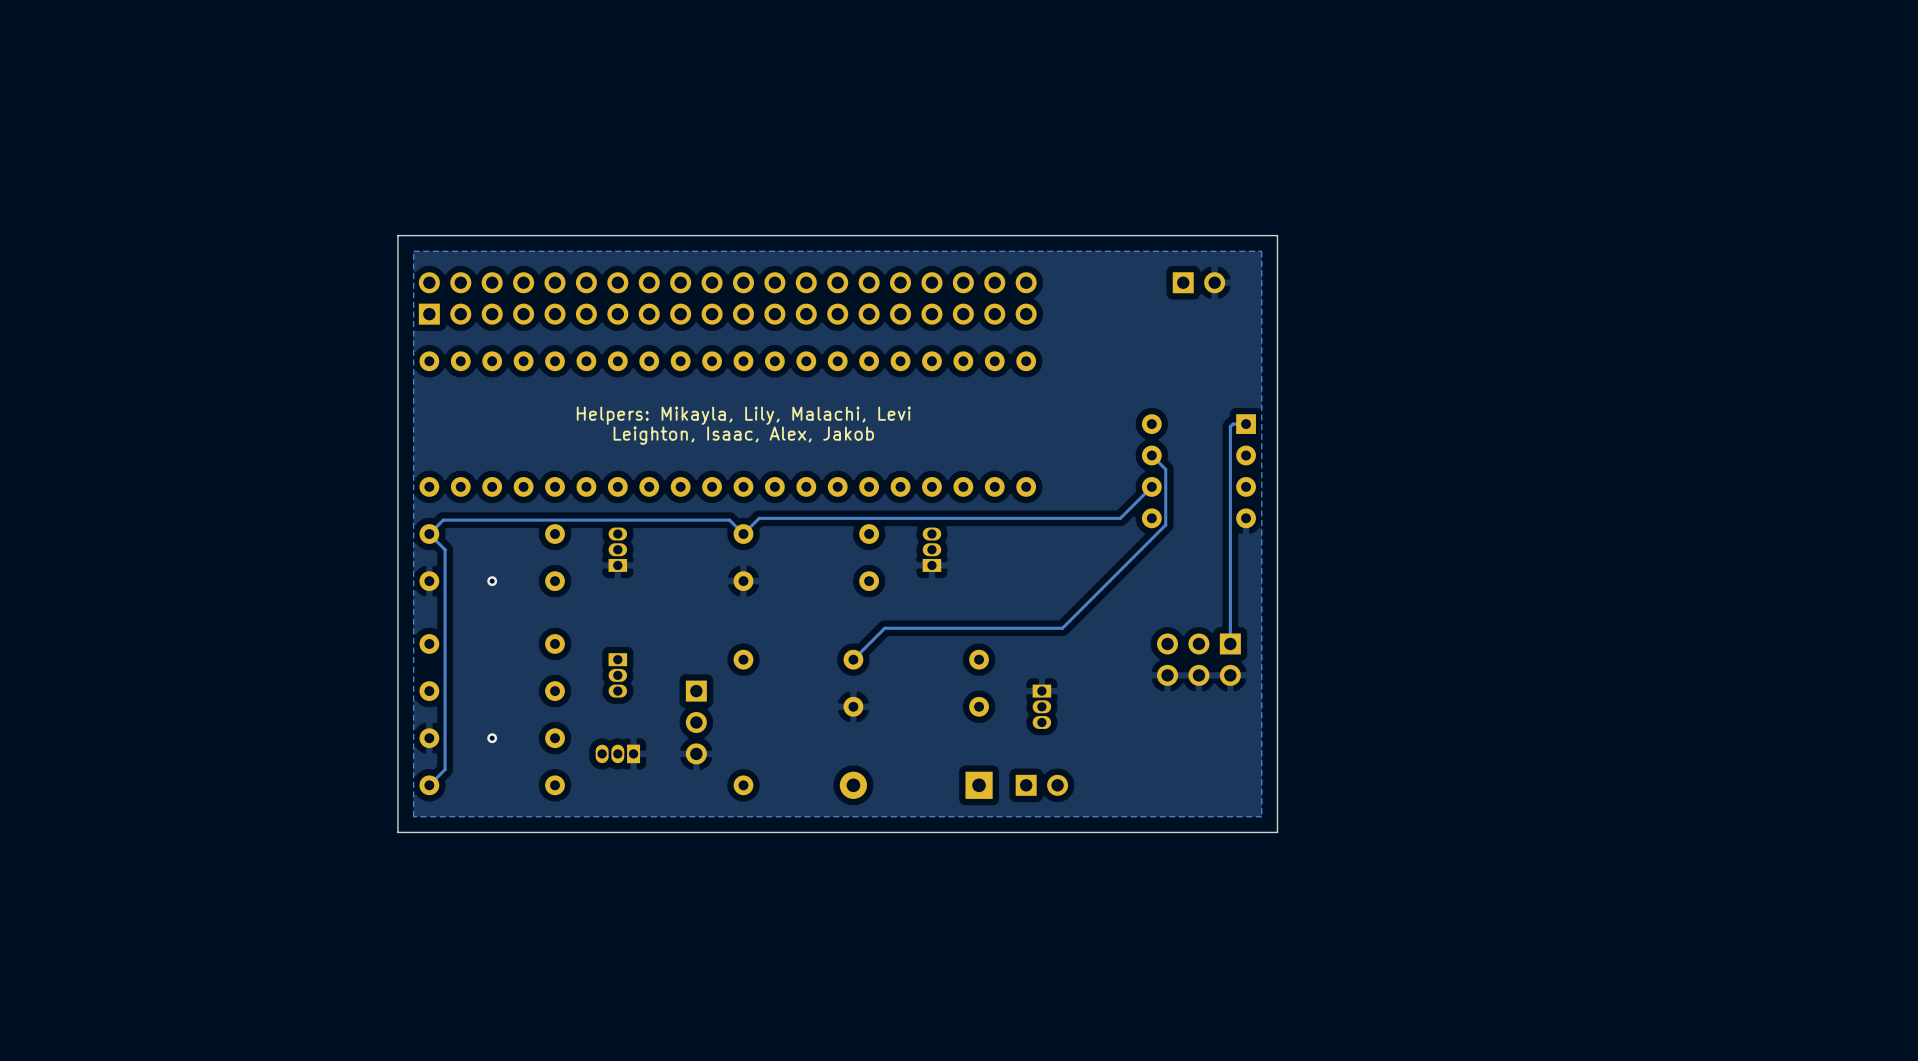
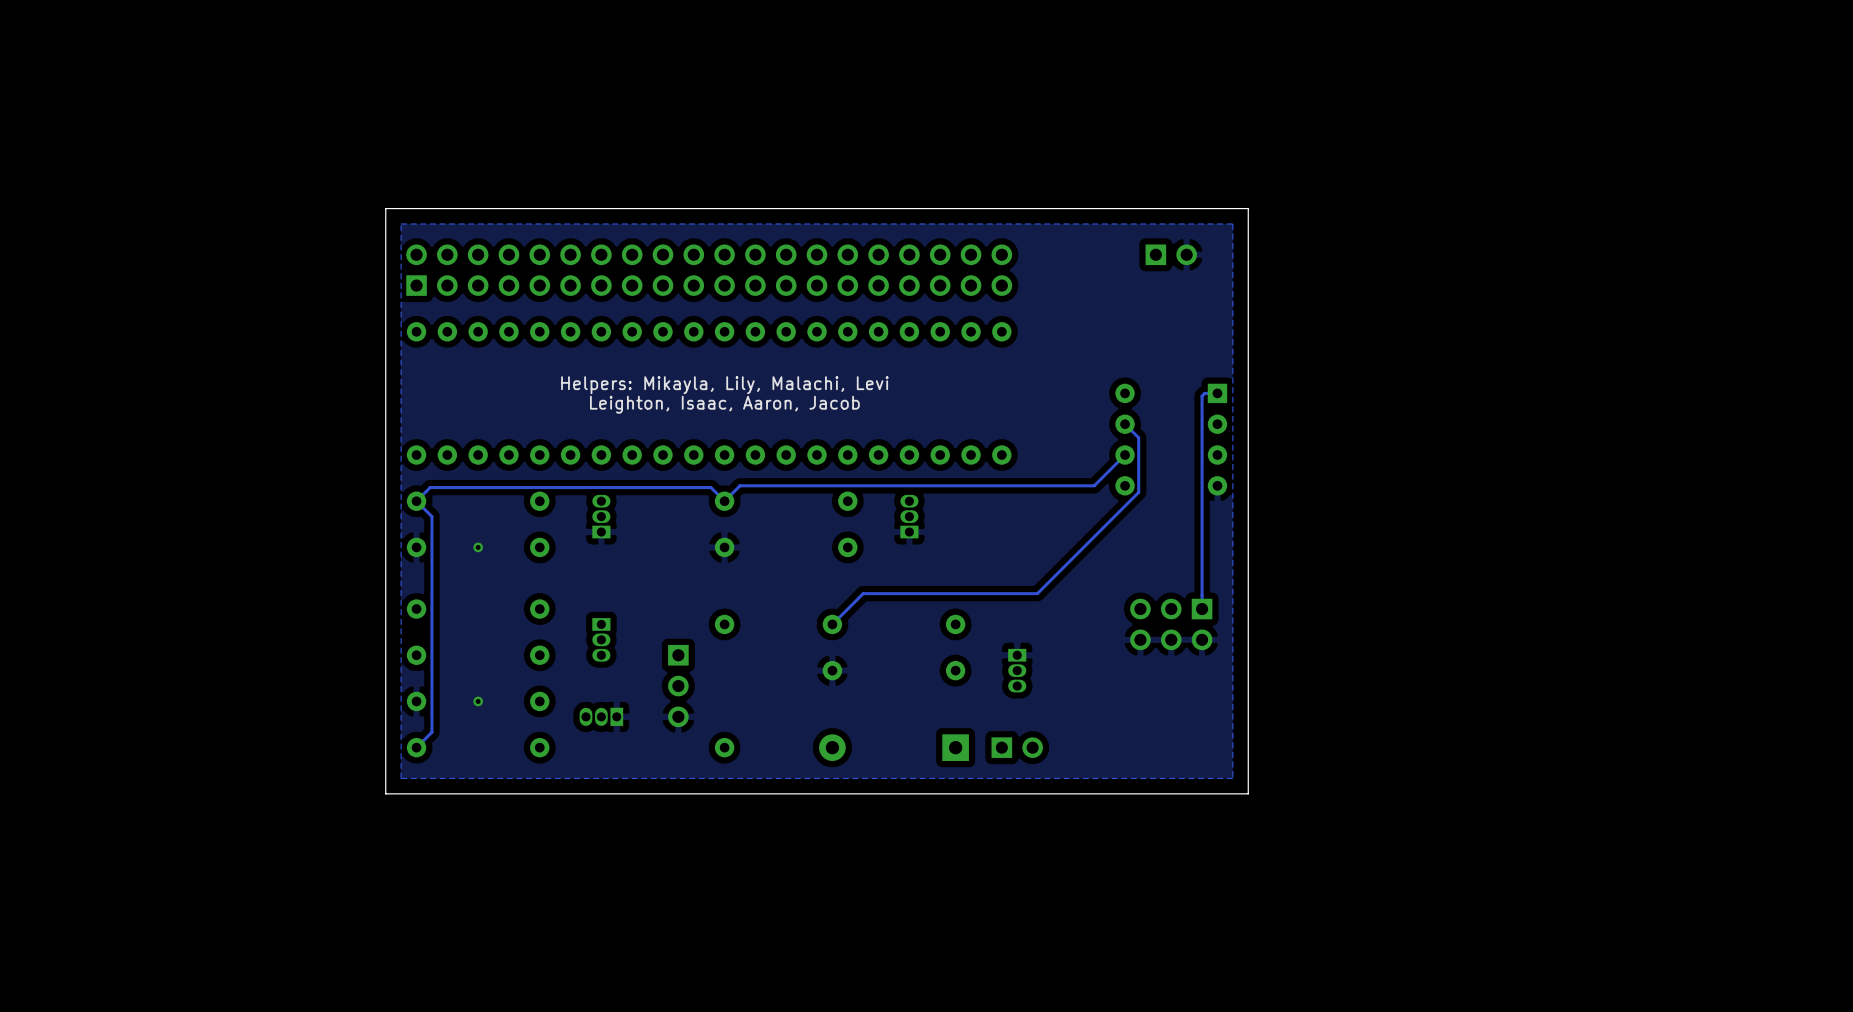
text: Leighton, Isaac, Alex, Jakob (743, 435) -> Leighton, Isaac, Aaron, Jacob (724, 404)

